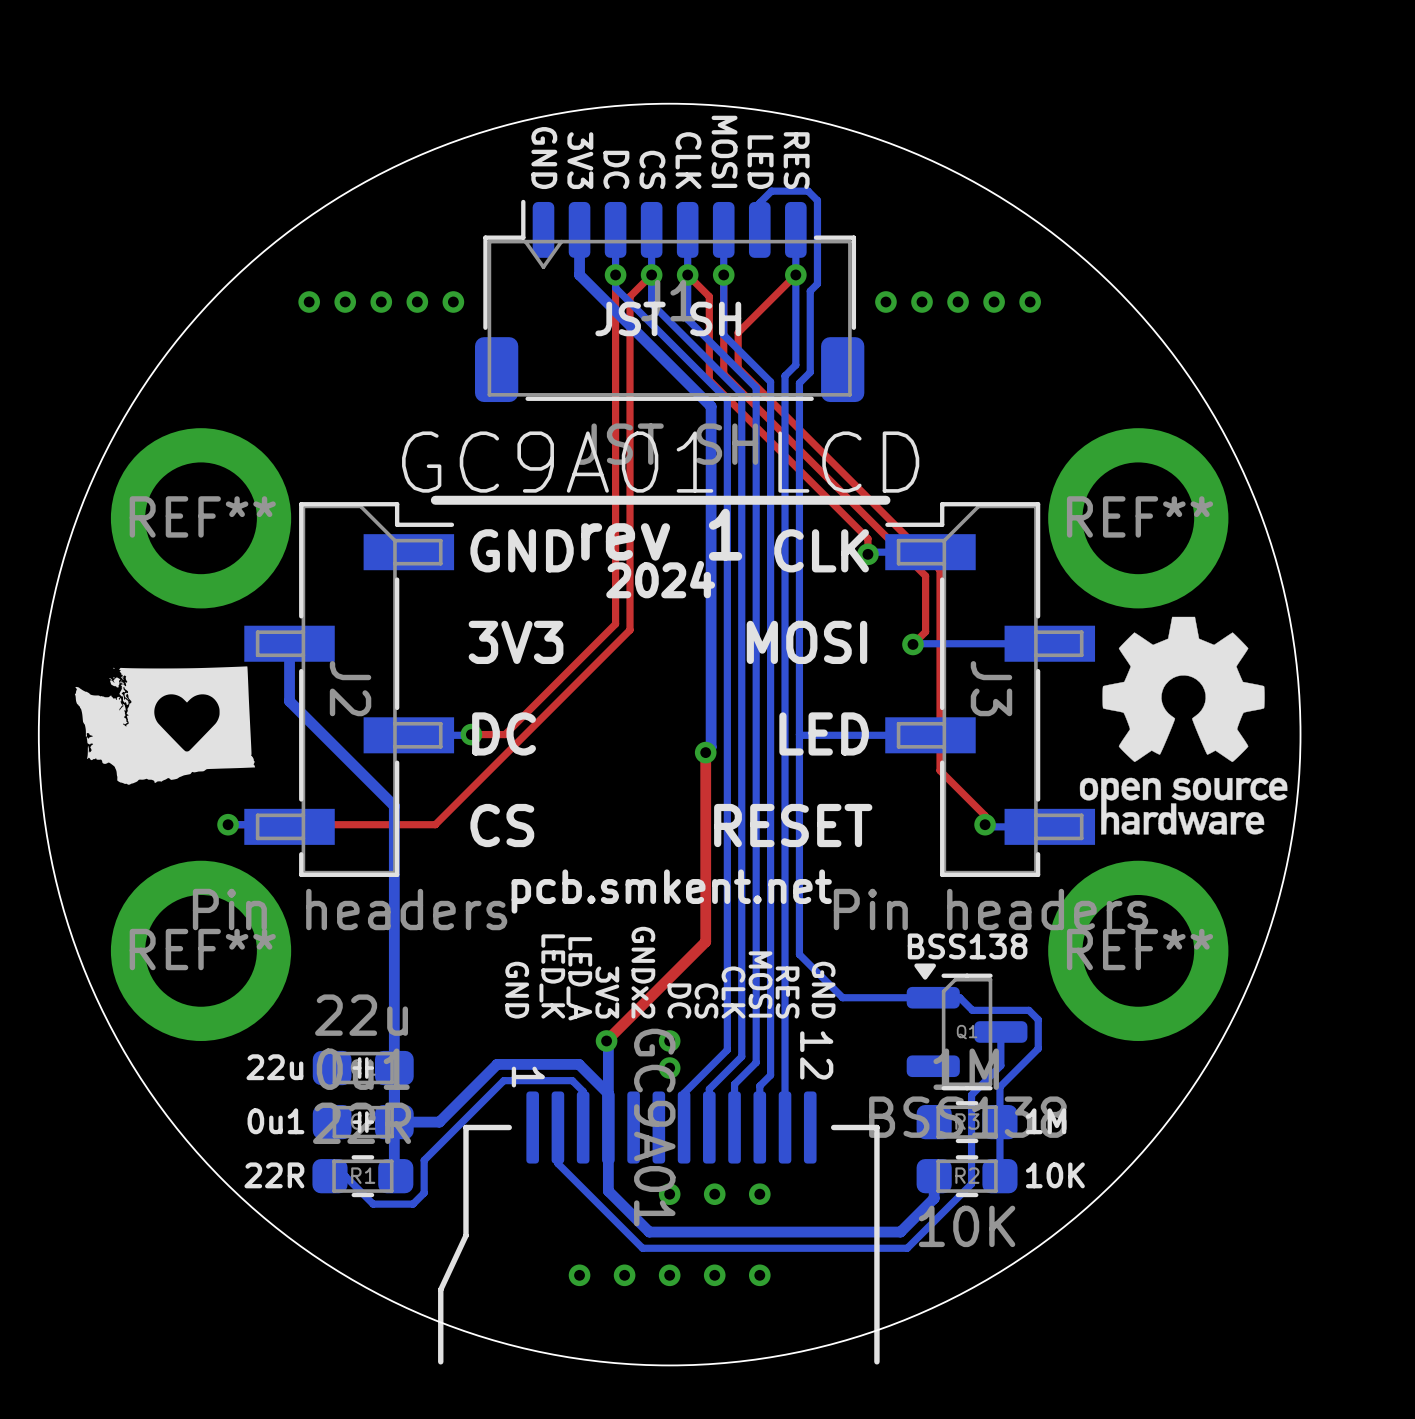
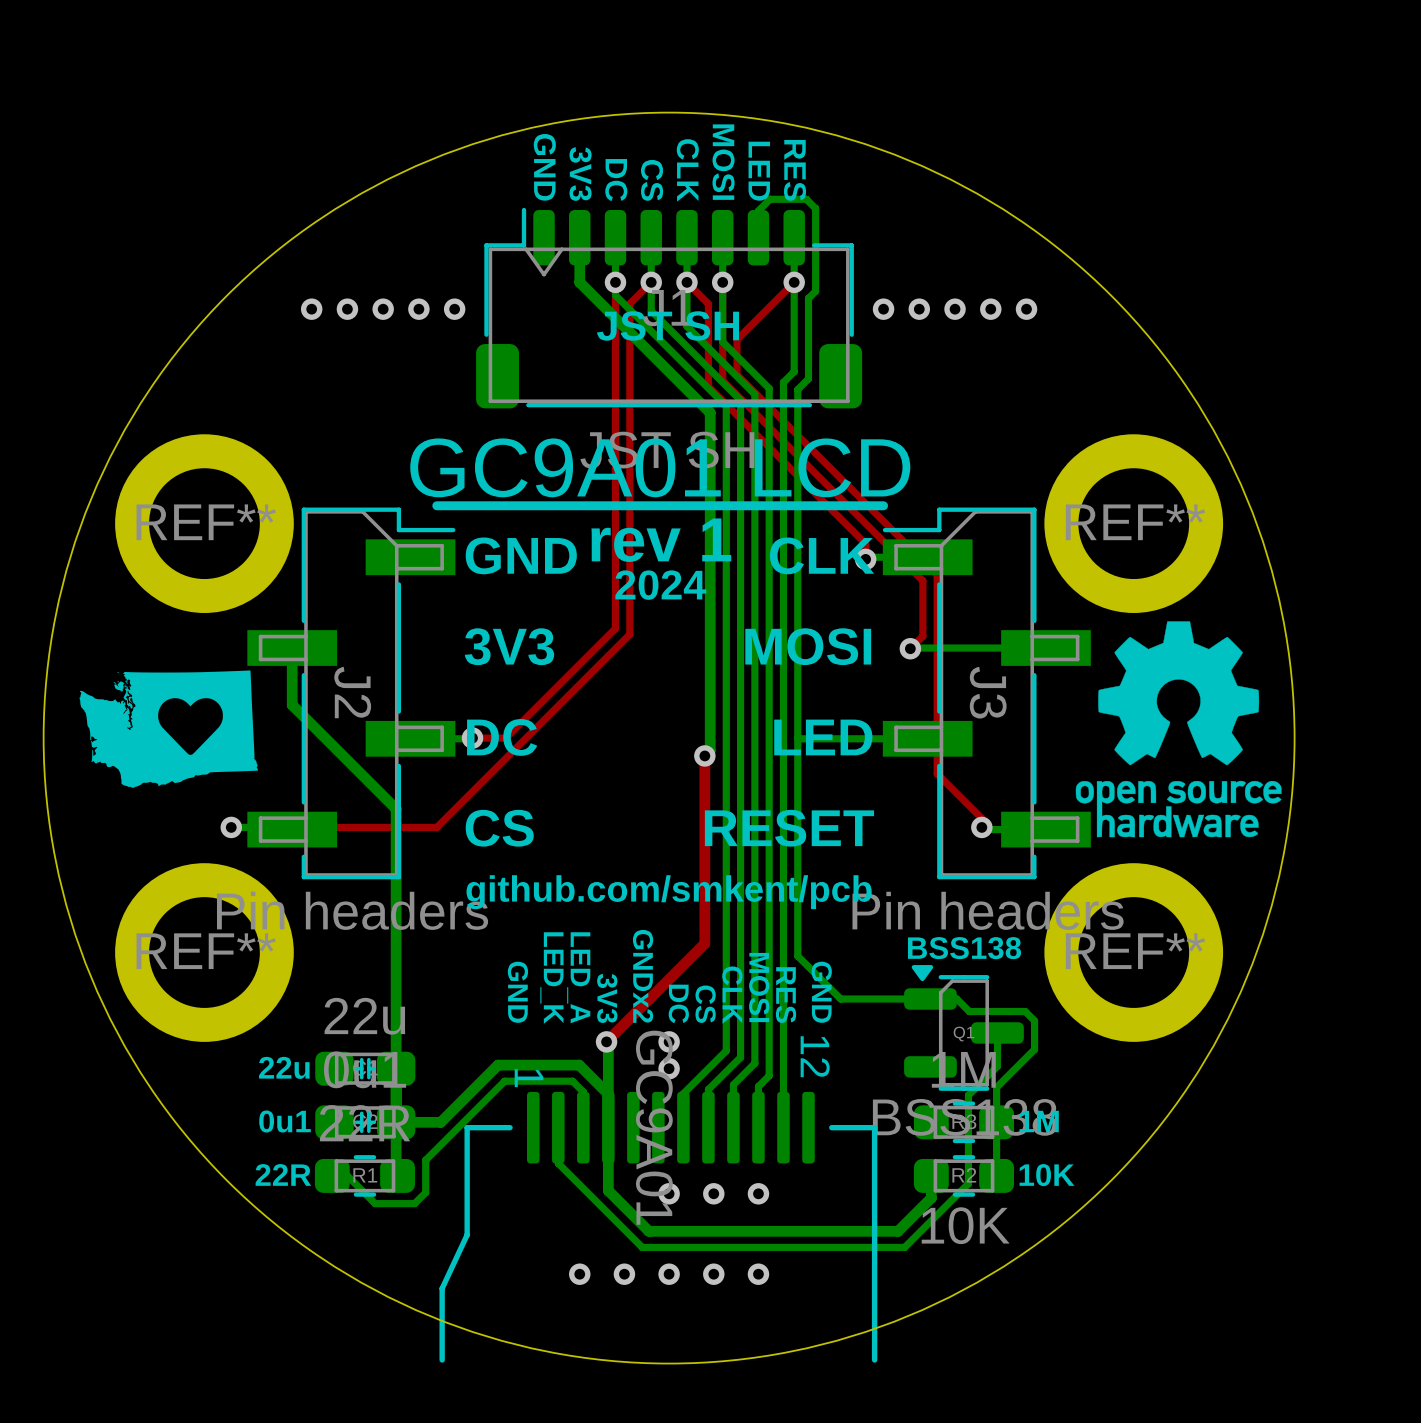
text: pcb.smkent.net (671, 891) -> github.com/smkent/pcb (669, 892)

